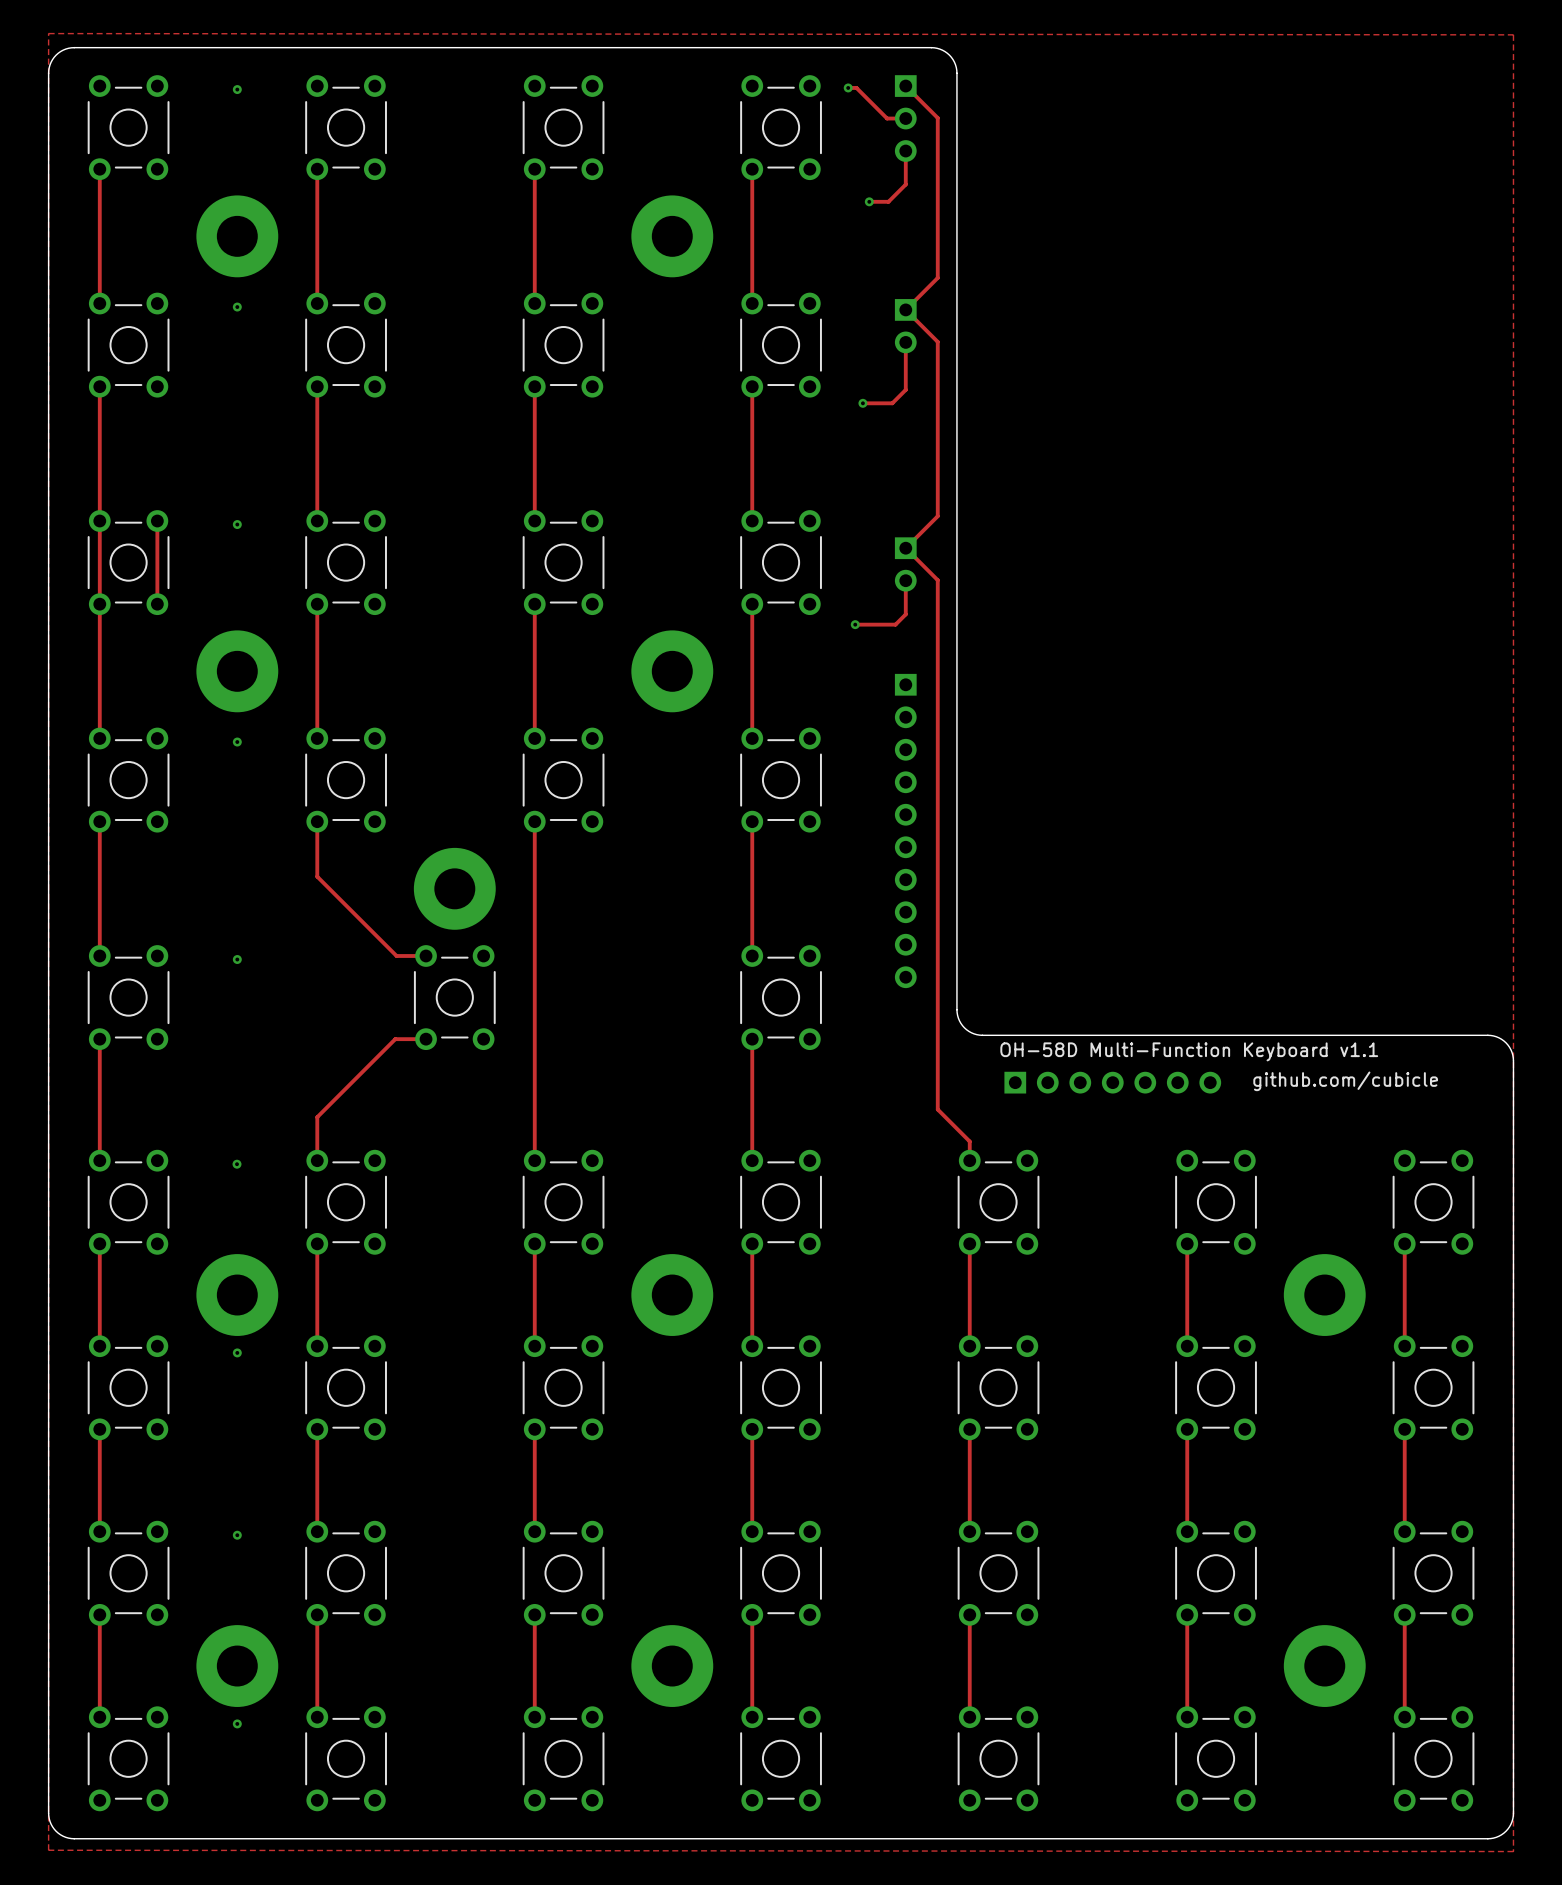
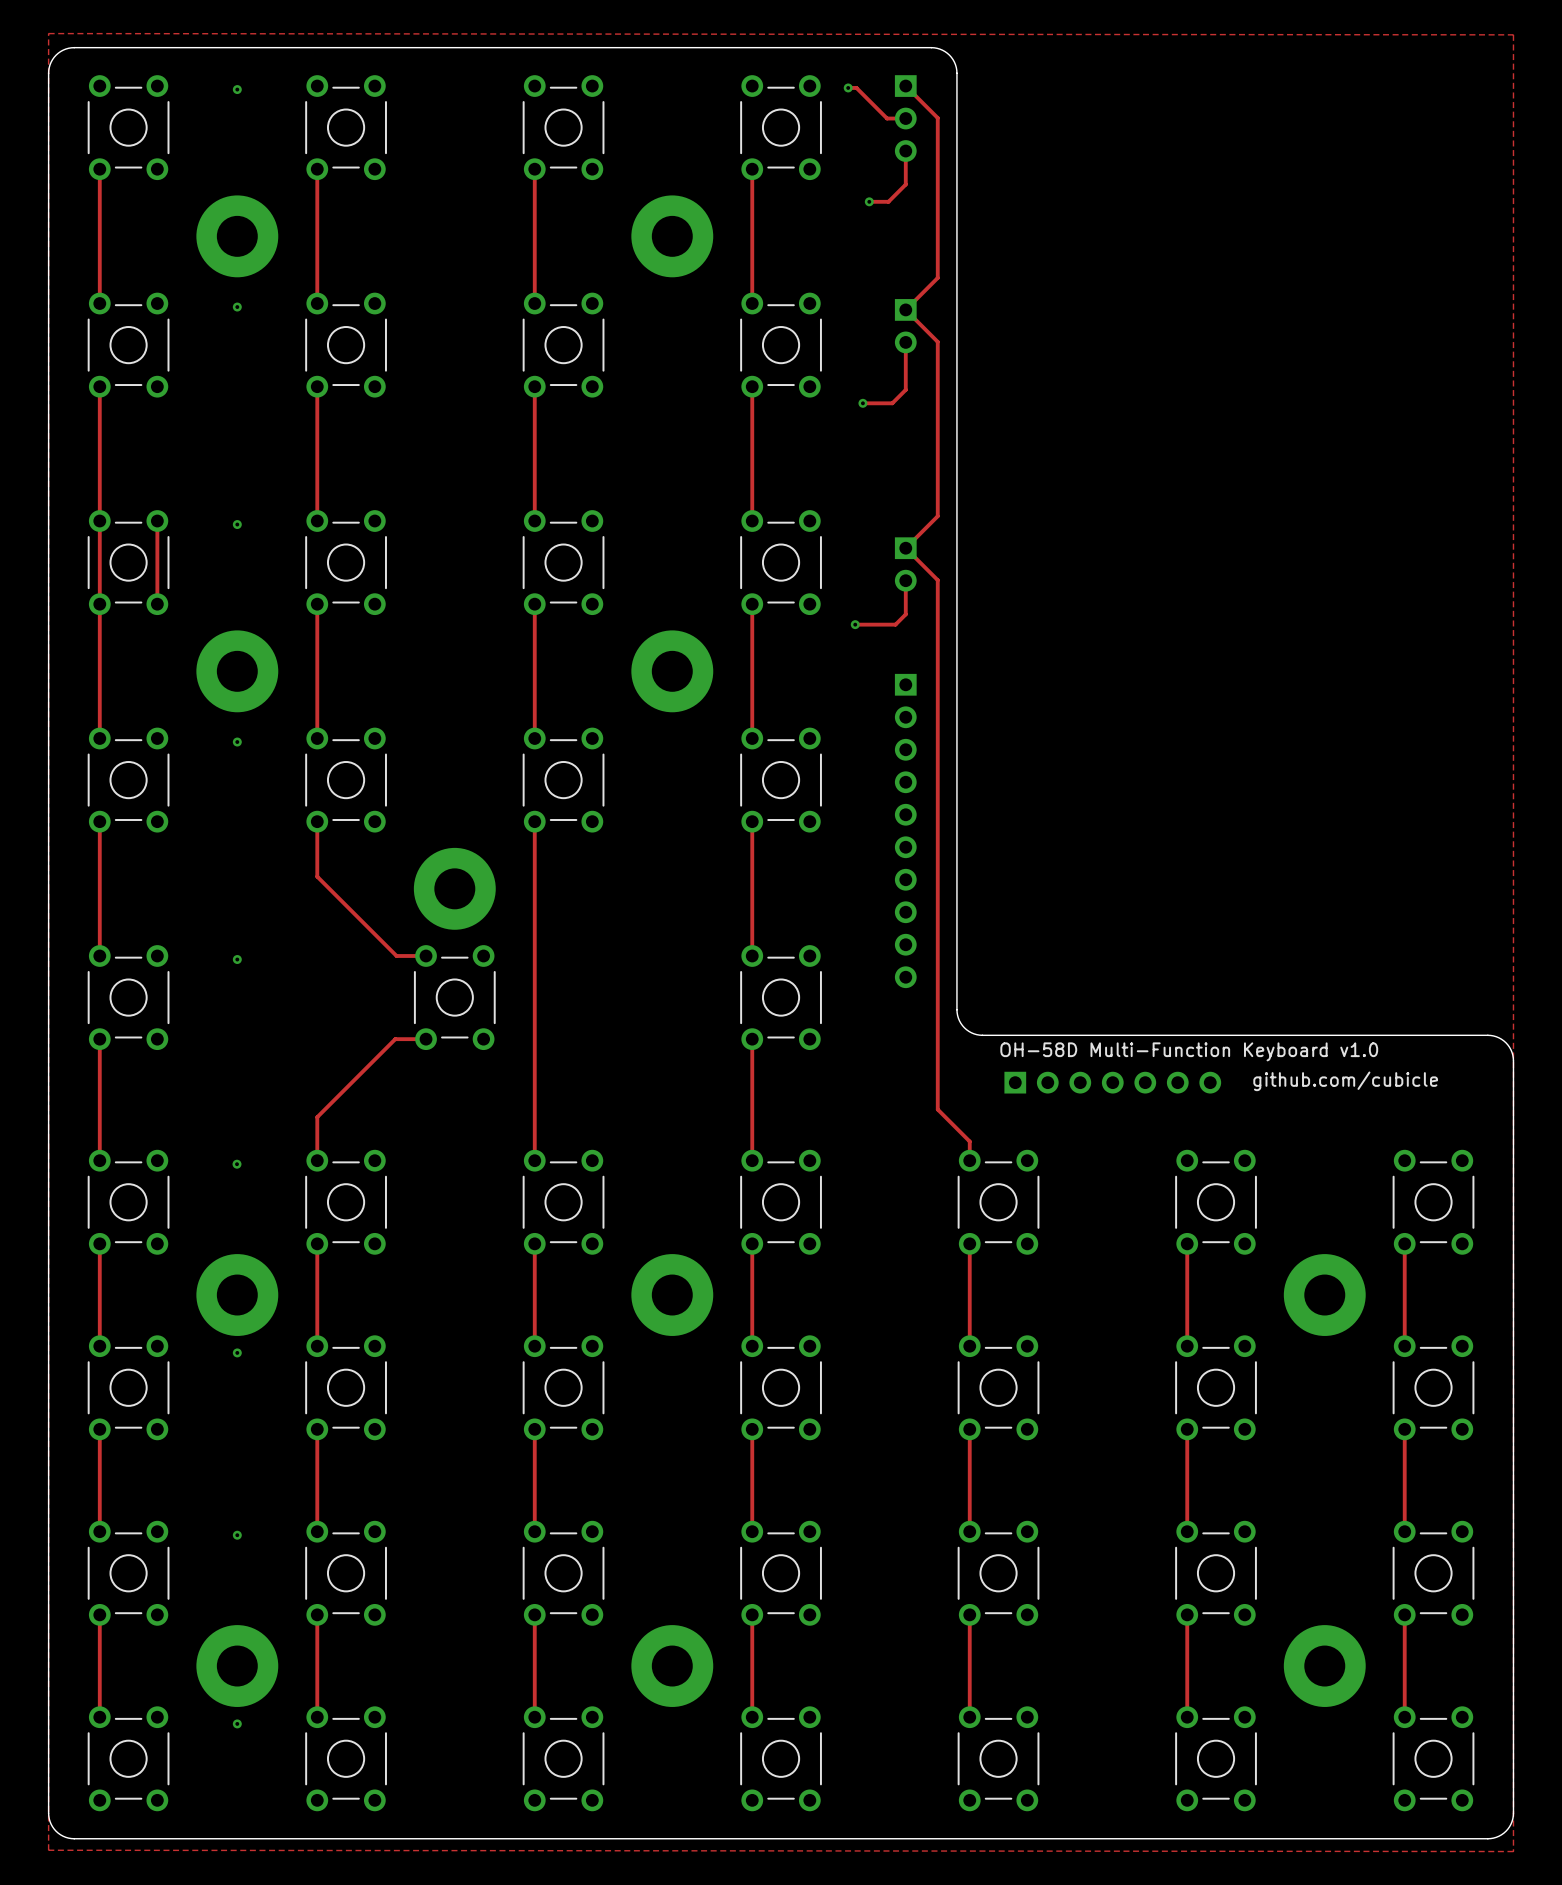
text: OH-58D Multi-Function Keyboard v1.1 (1189, 1051) -> OH-58D Multi-Function Keyboard v1.0 (1189, 1051)

